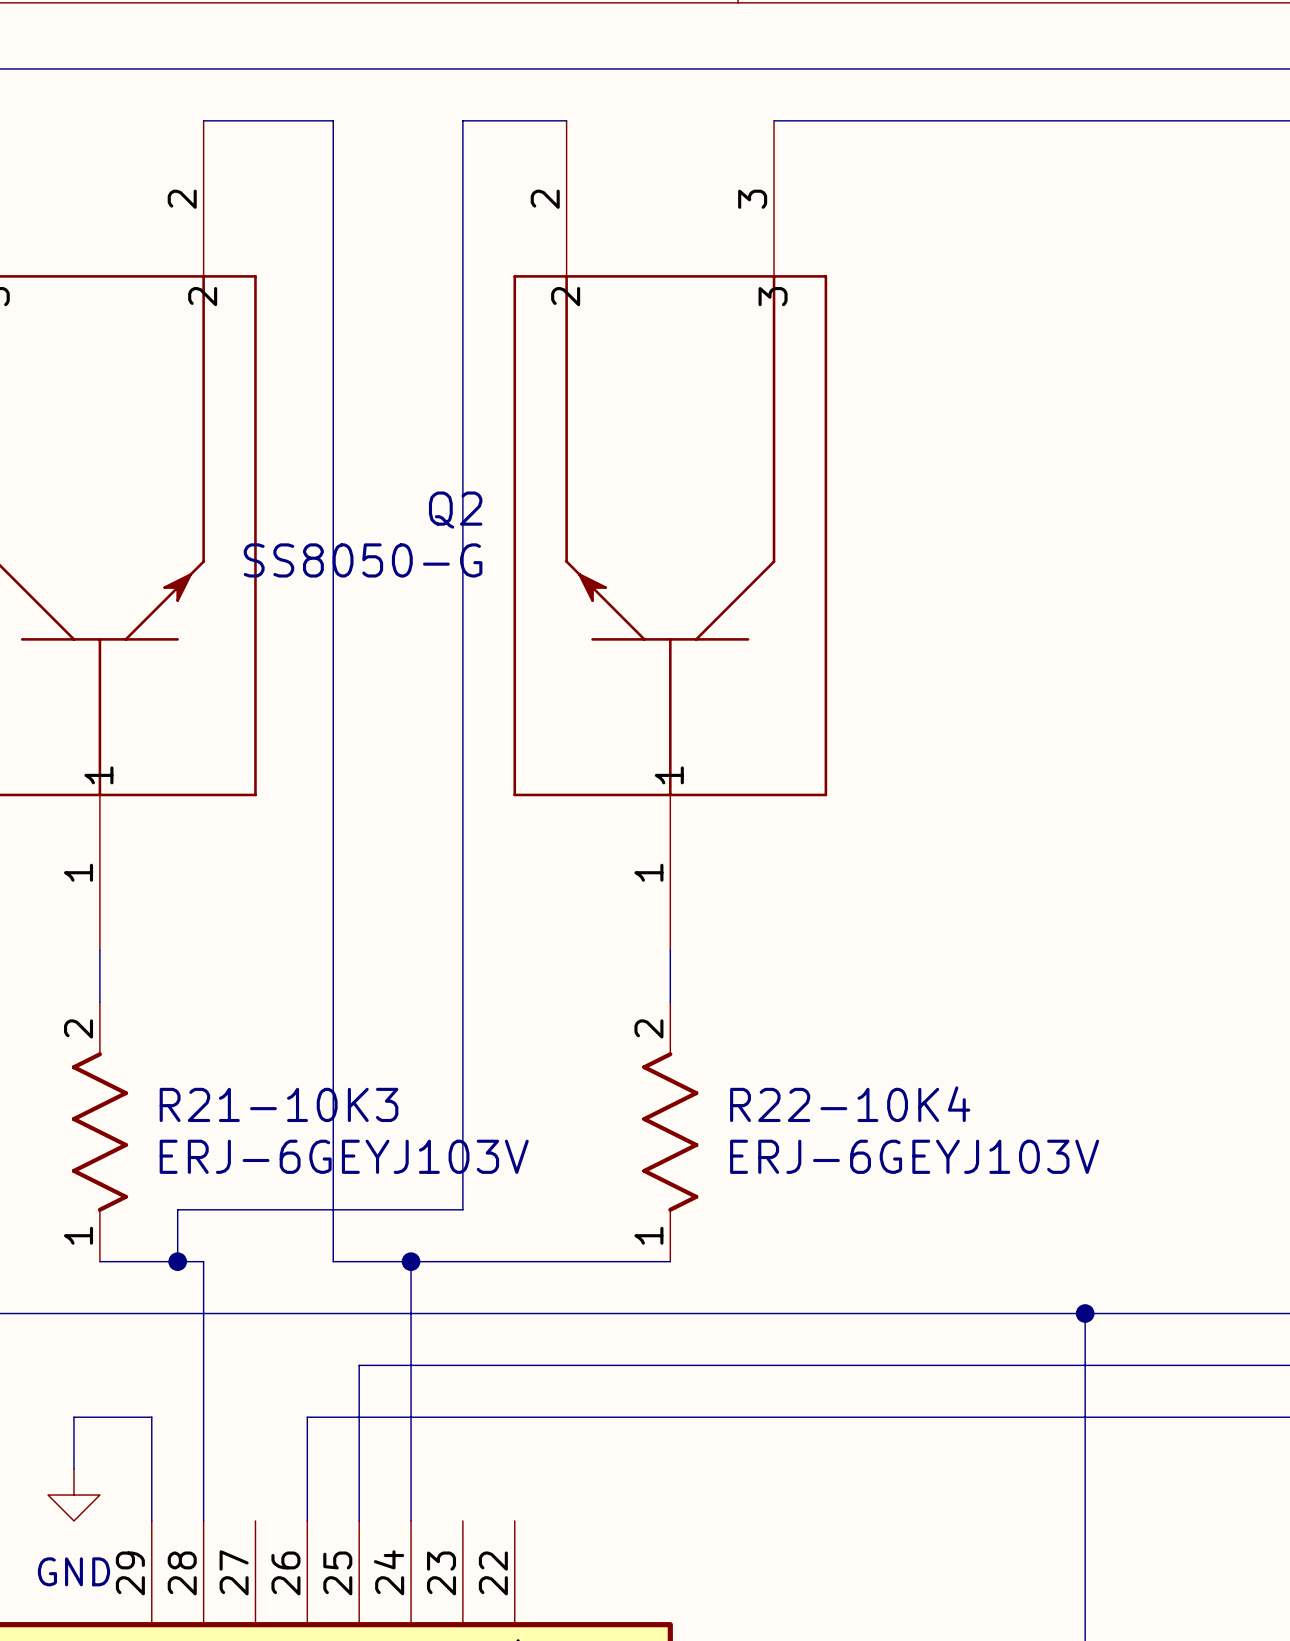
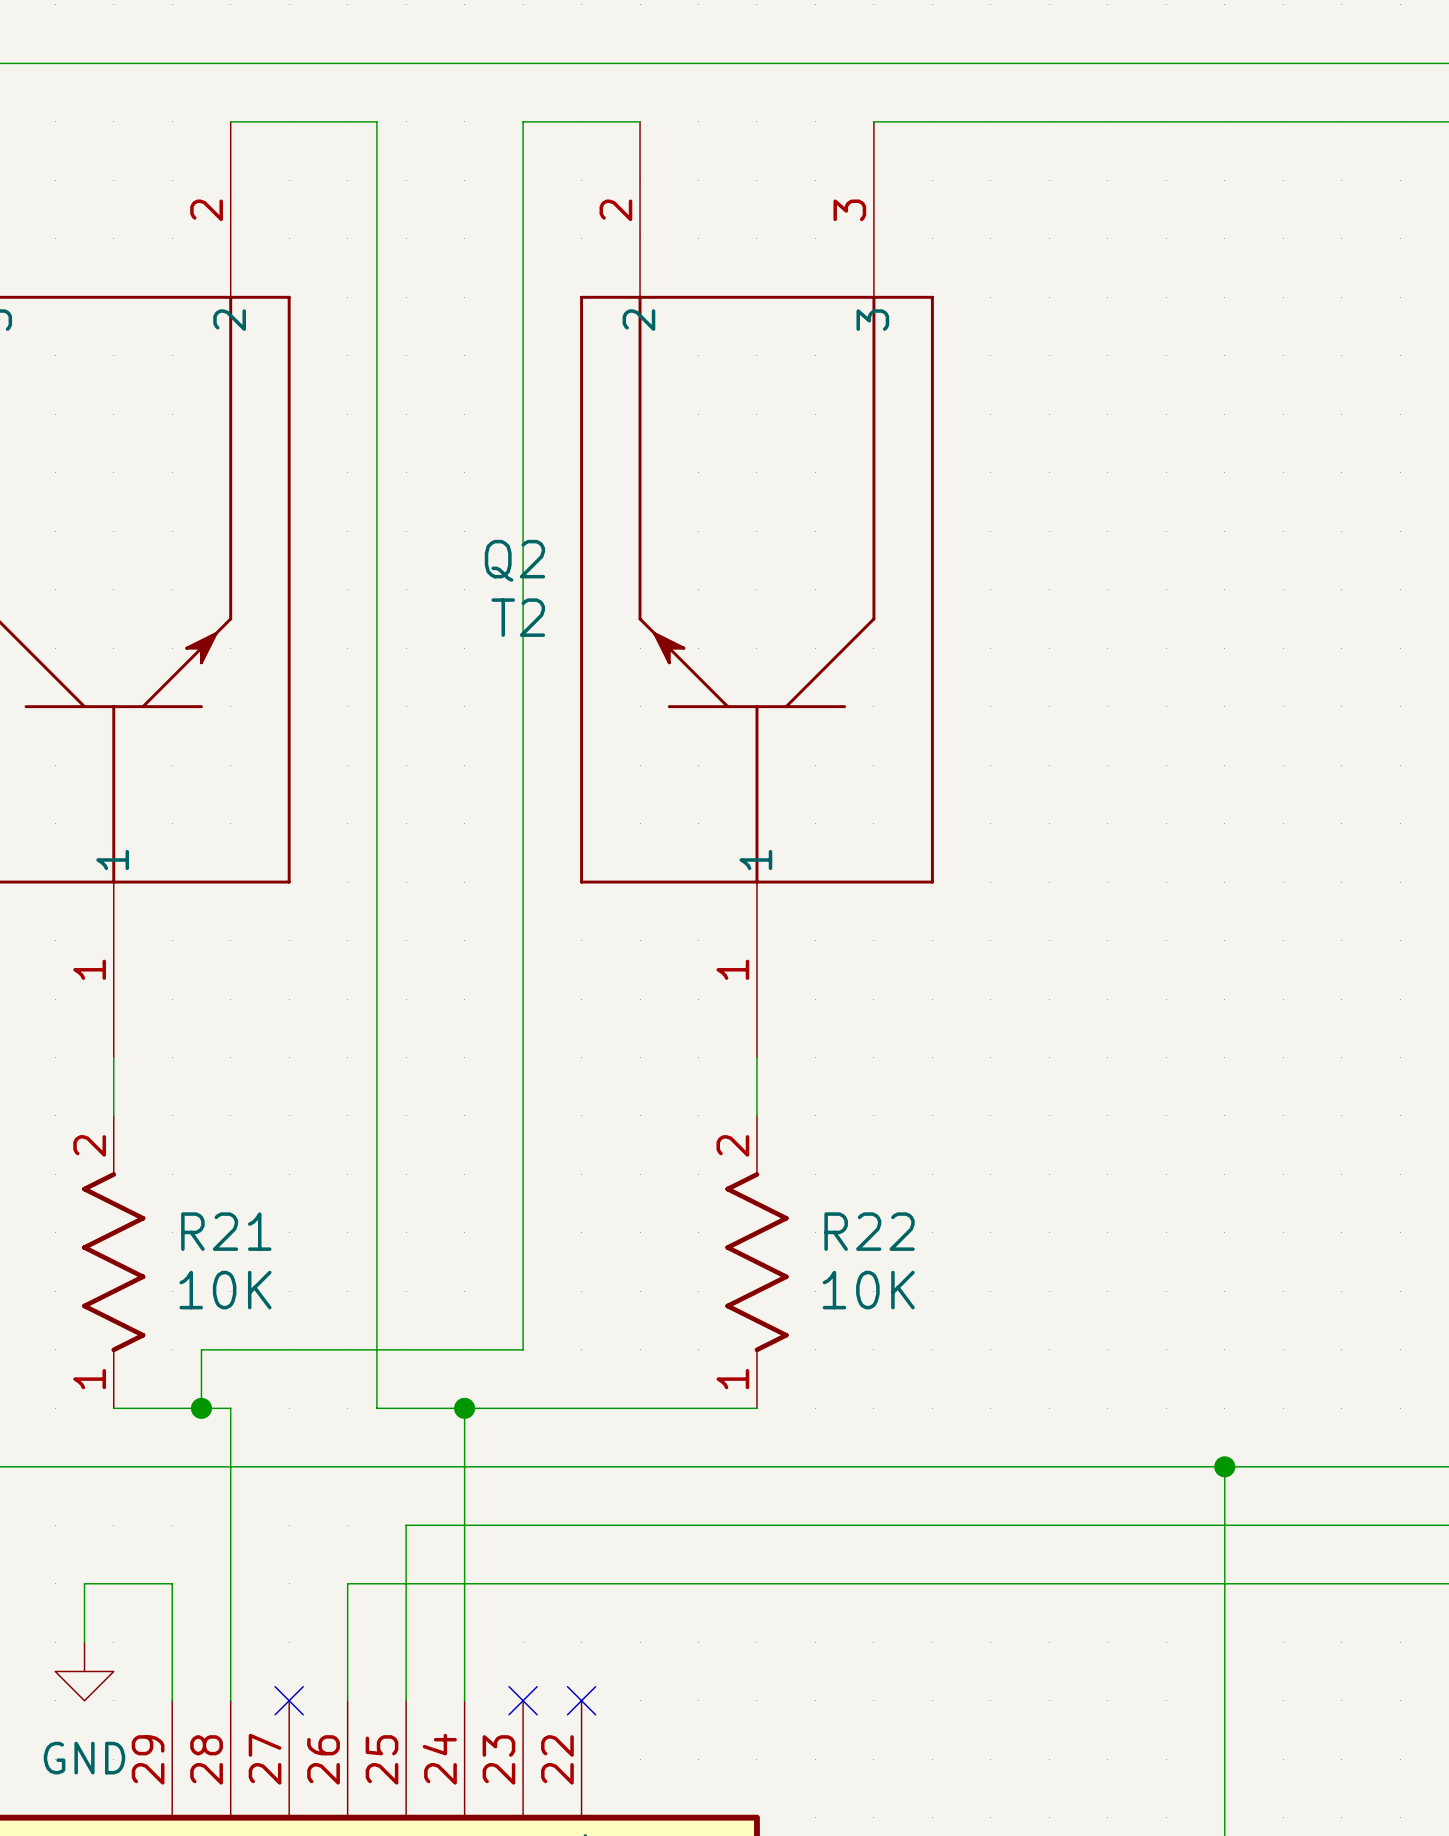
Q2 value: SS8050-G (363, 560) -> T2 (518, 617)
R21-10K3 name: R21-10K3 (279, 1104) -> R21 (226, 1231)
R22-10K4 name: R22-10K4 (850, 1104) -> R22 (869, 1231)
R21-10K3 value: ERJ-6GEYJ103V (344, 1156) -> 10K (225, 1290)
R22-10K4 value: ERJ-6GEYJ103V (914, 1156) -> 10K (868, 1290)
no-connect mark: none -> (289, 1700)
no-connect mark: none -> (523, 1700)
no-connect mark: none -> (581, 1700)

